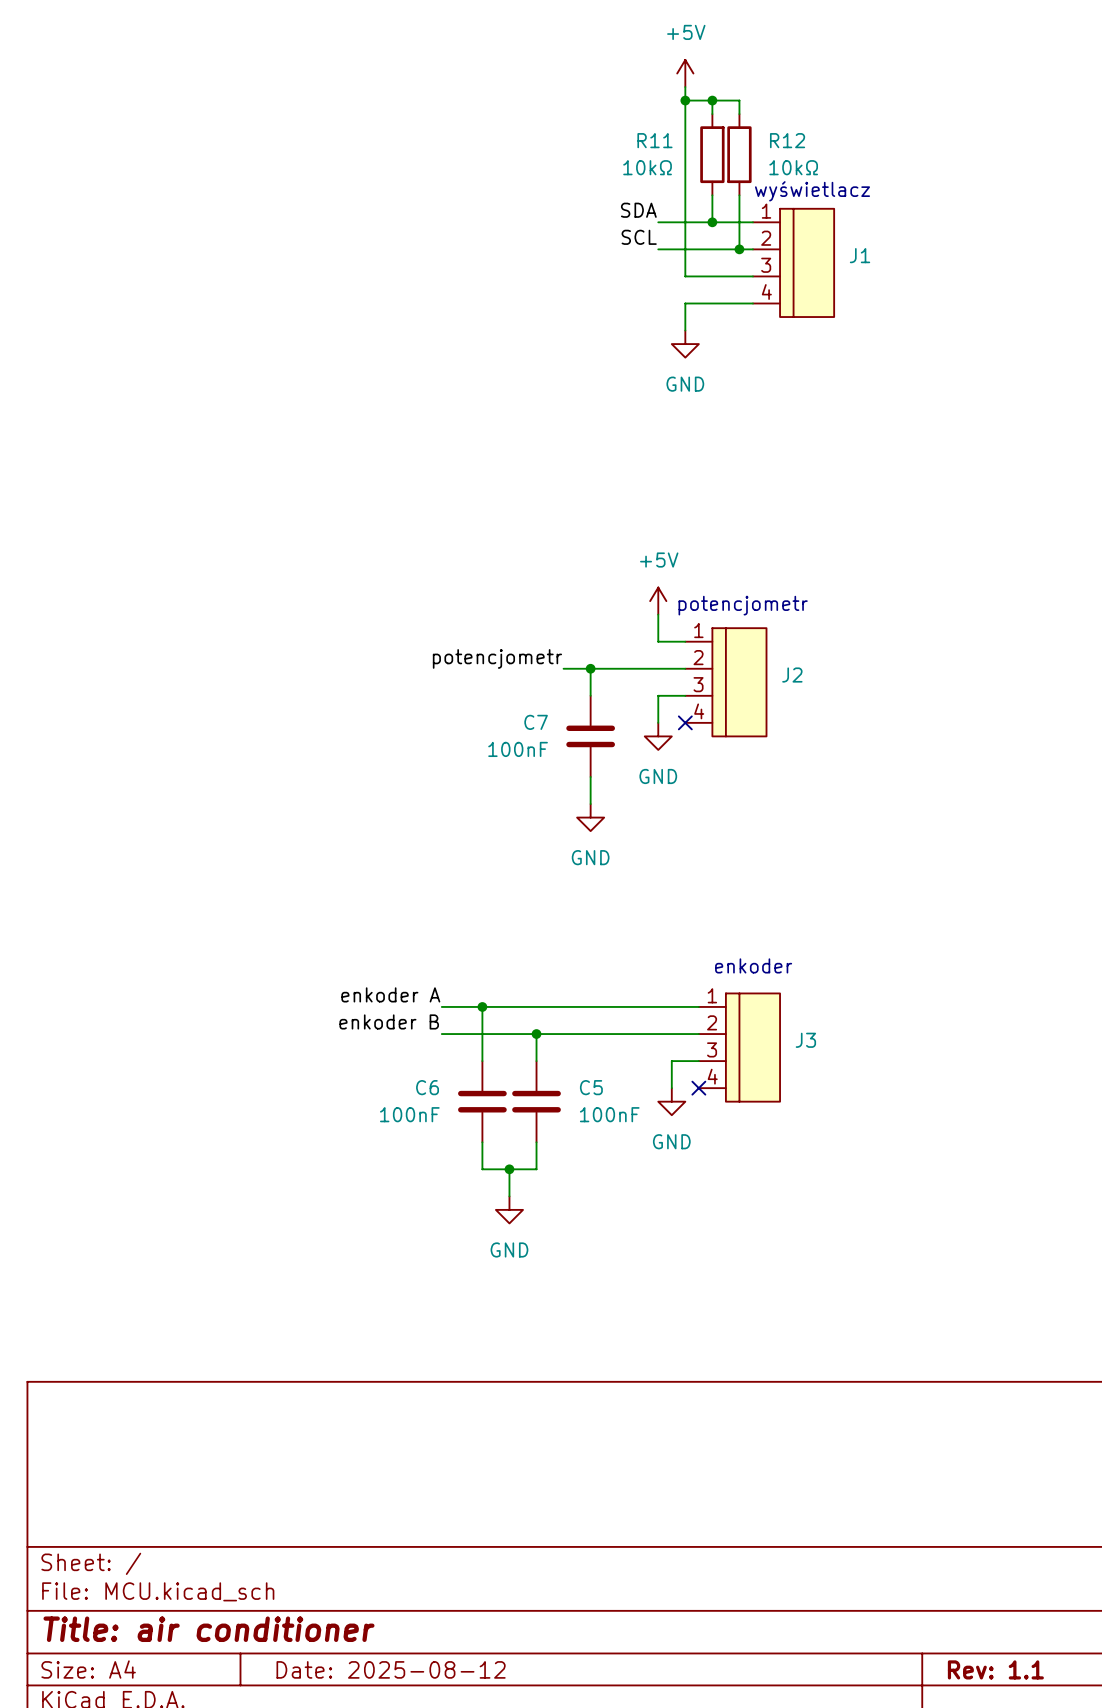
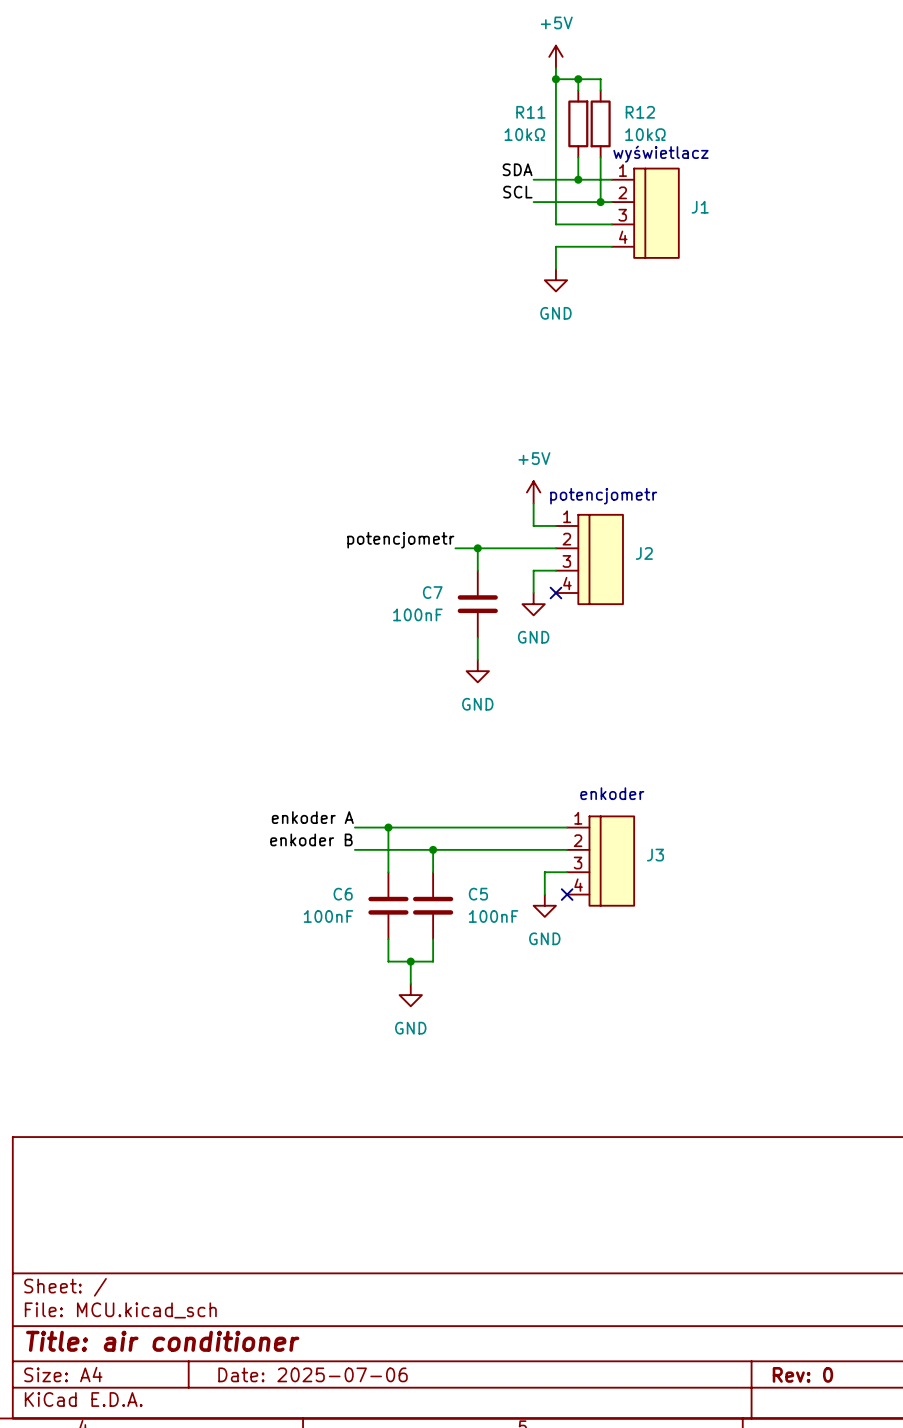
title block: Date: 2025-08-12 (391, 1669) -> Date: 2025-07-06 (313, 1374)
title block: Rev: 1.1 (995, 1669) -> Rev: 0 (802, 1374)

